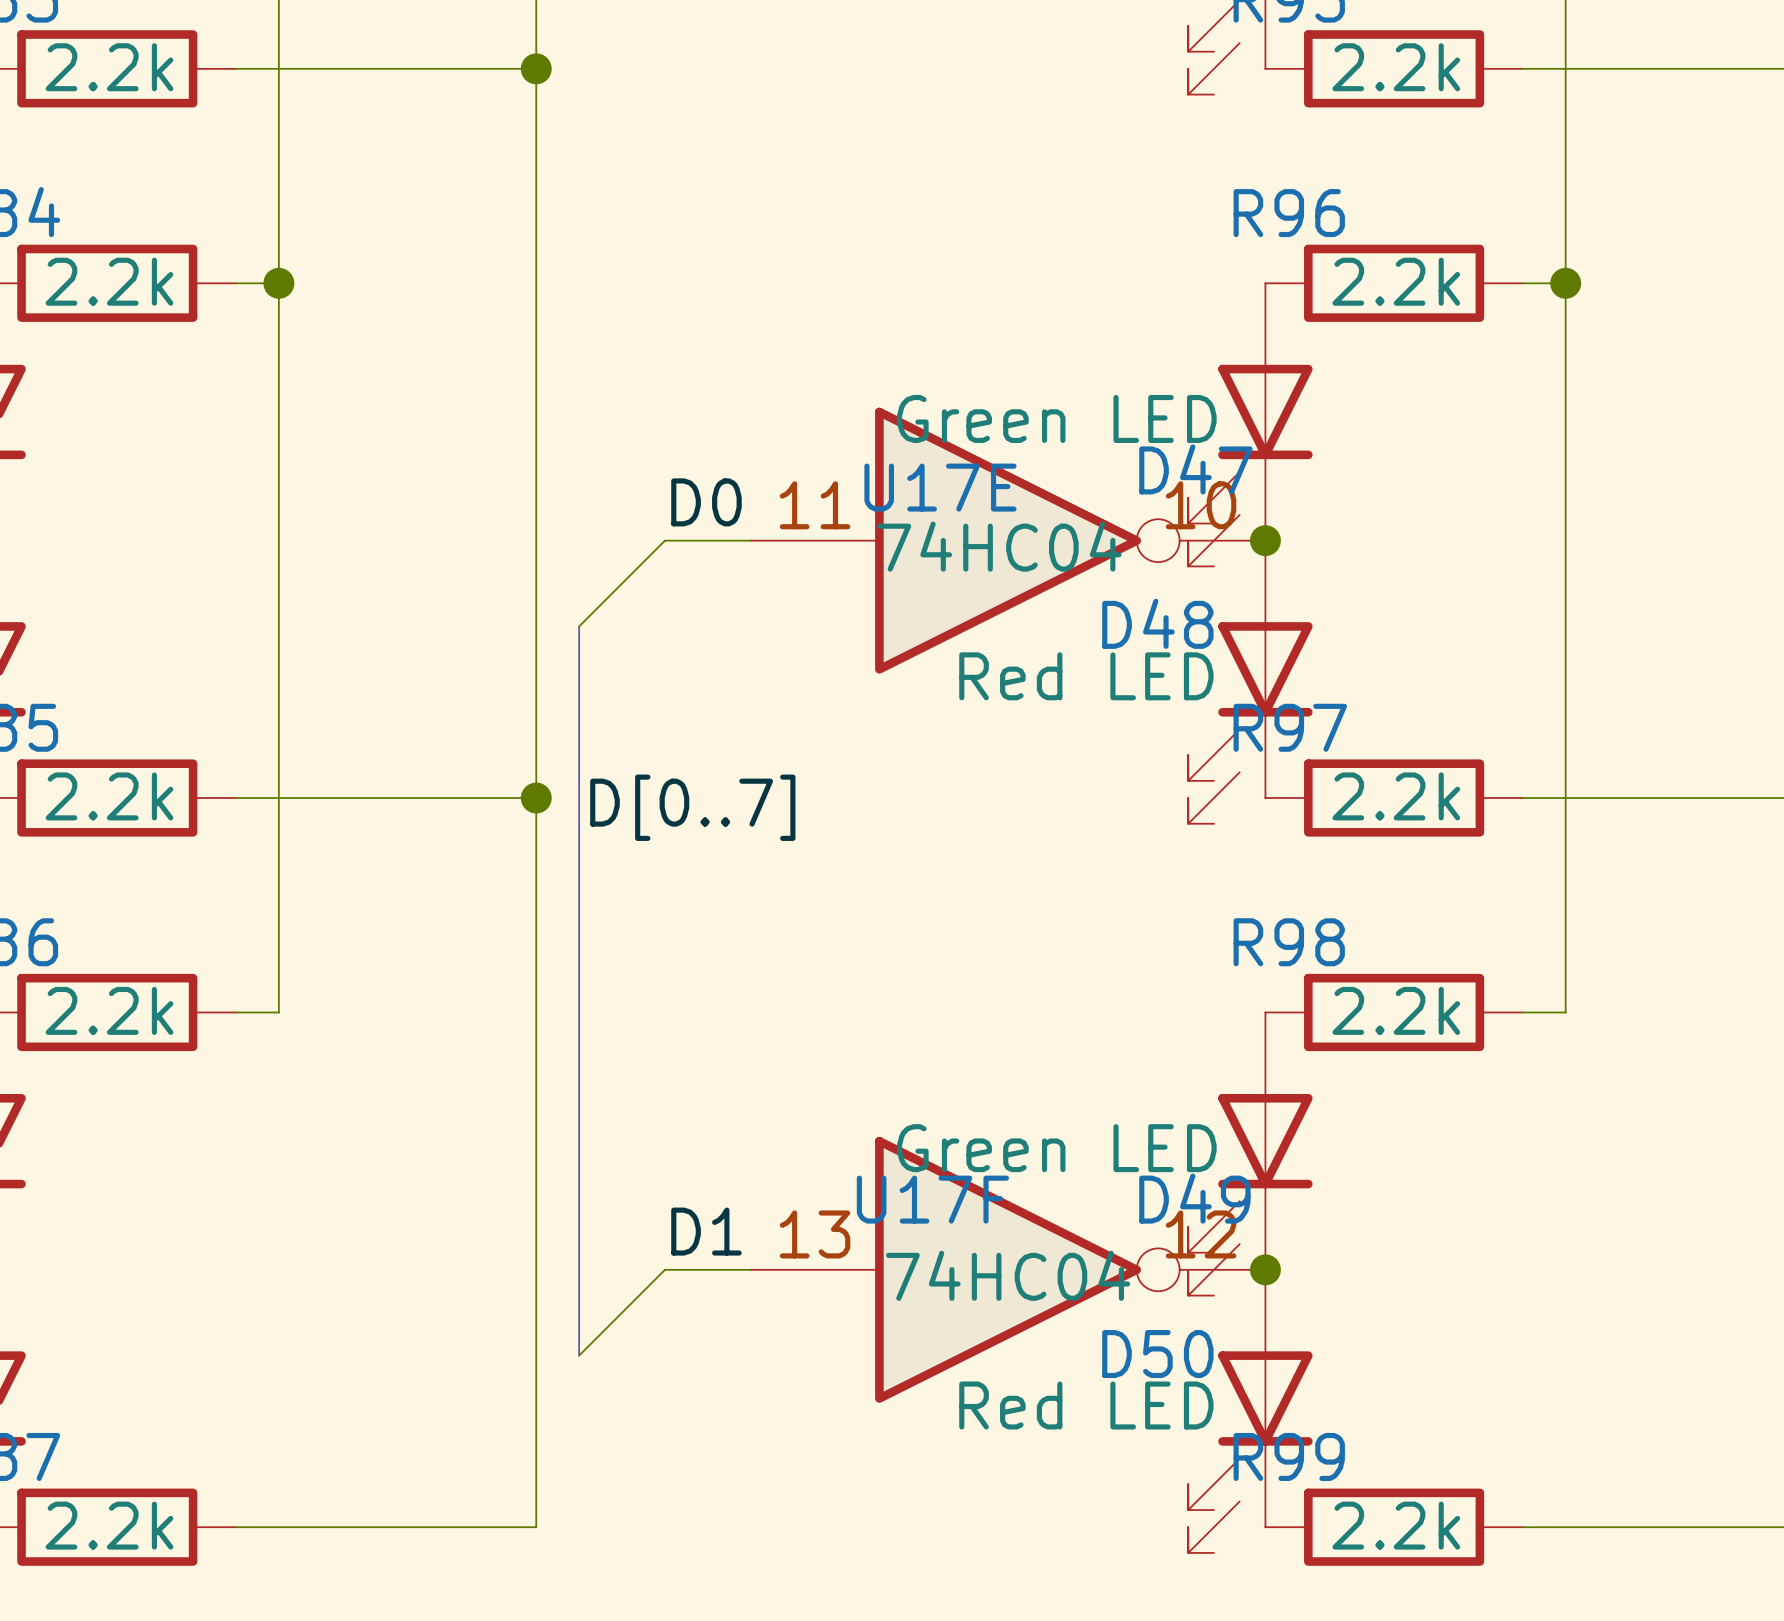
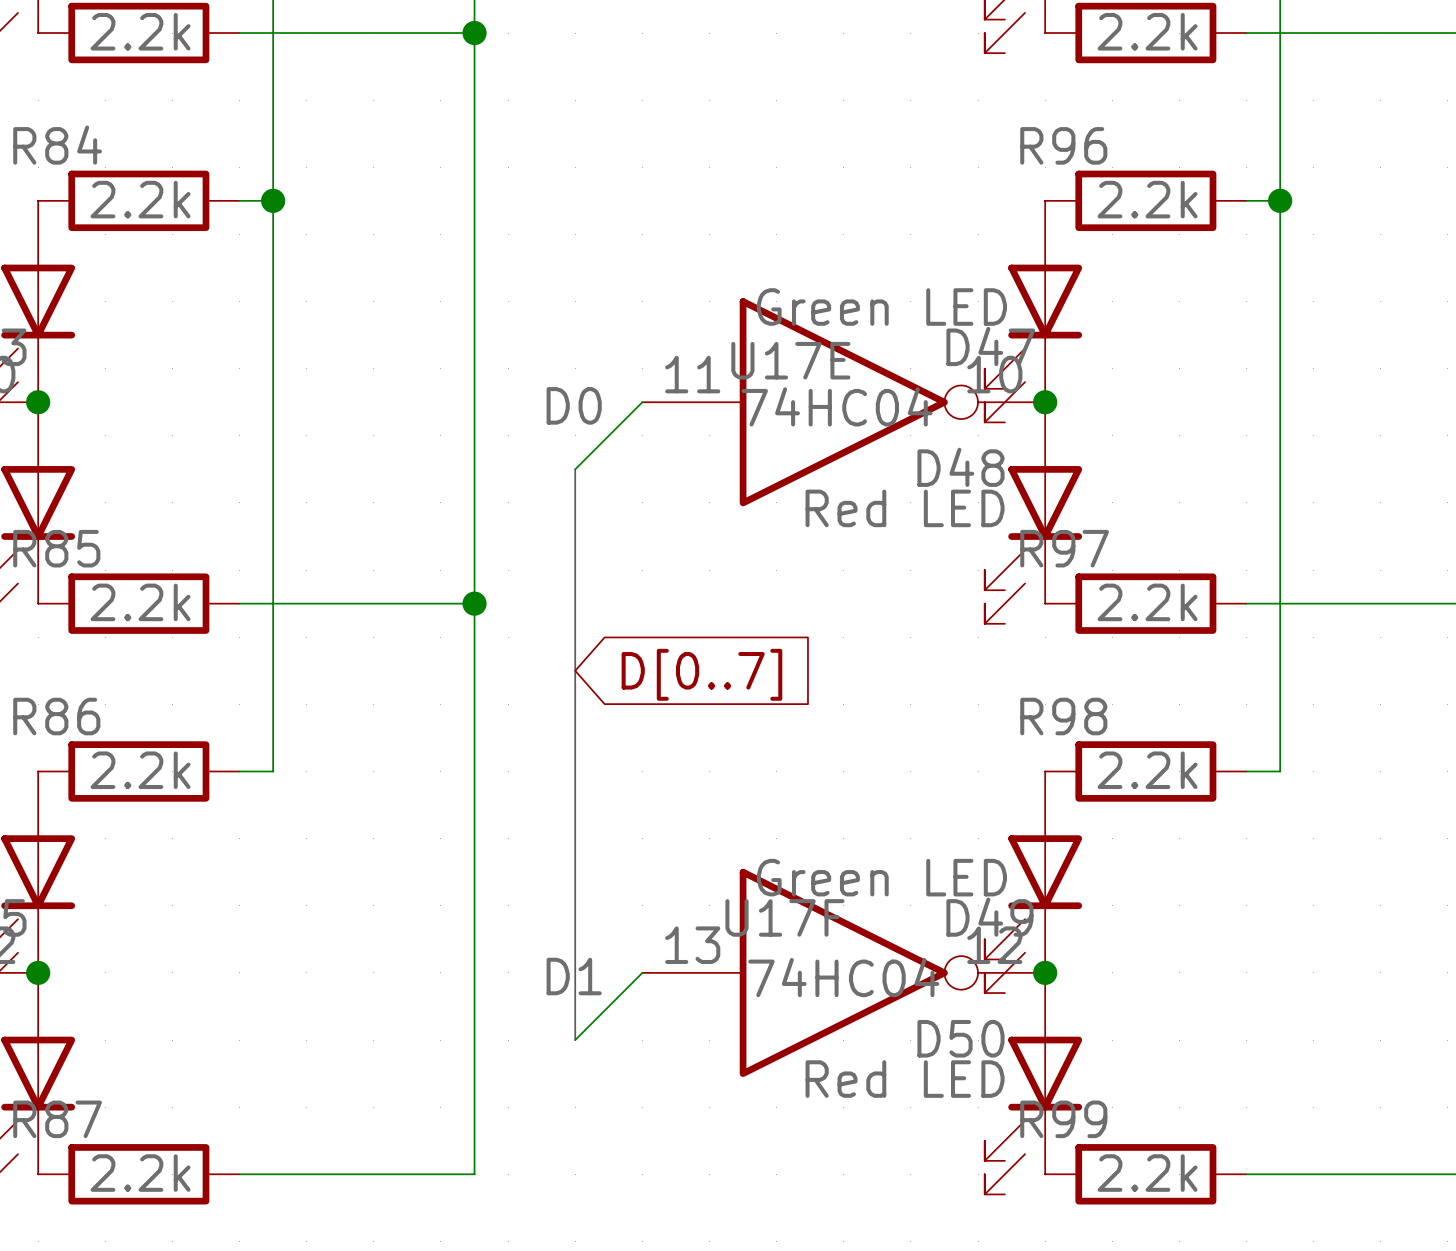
label position: D0 (706, 502) -> D0 (574, 405)
wire: (750, 540) (664, 540) (579, 626) -> (642, 402) (575, 469)
bus: (579, 626) (579, 1355) -> (575, 469) (575, 1040)
label: D[0..7] (692, 807) -> none
global label: none -> D[0..7] (701, 674)
label position: D1 (706, 1231) -> D1 (574, 976)
wire: (750, 1269) (664, 1269) (579, 1355) -> (642, 972) (575, 1040)

